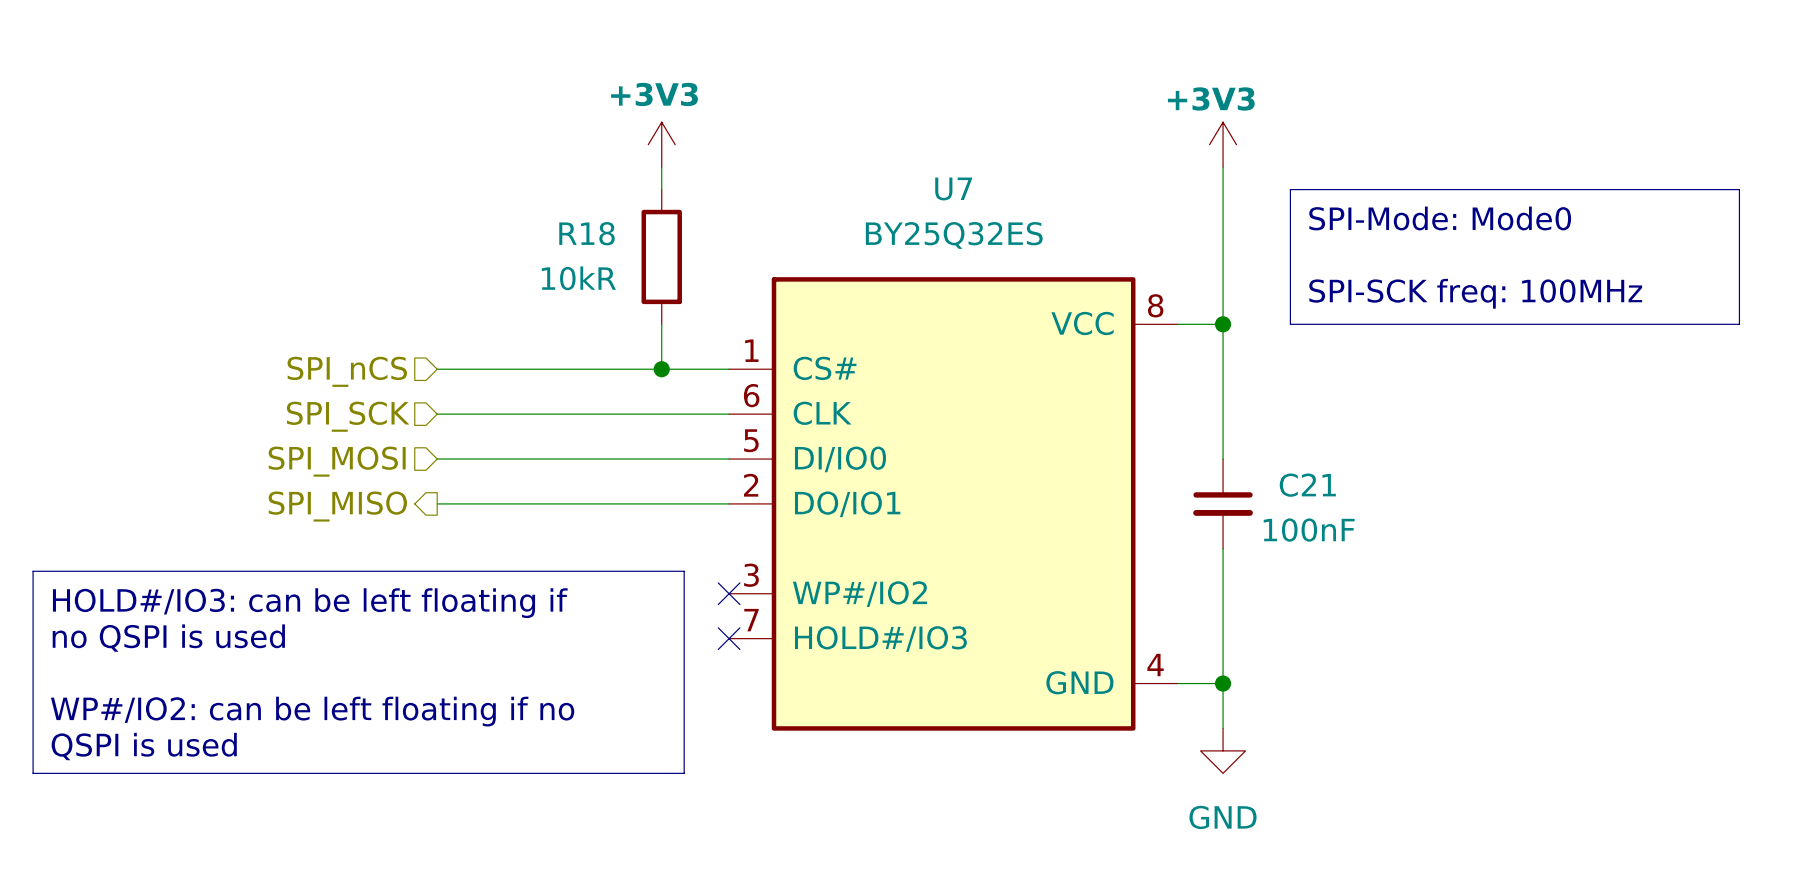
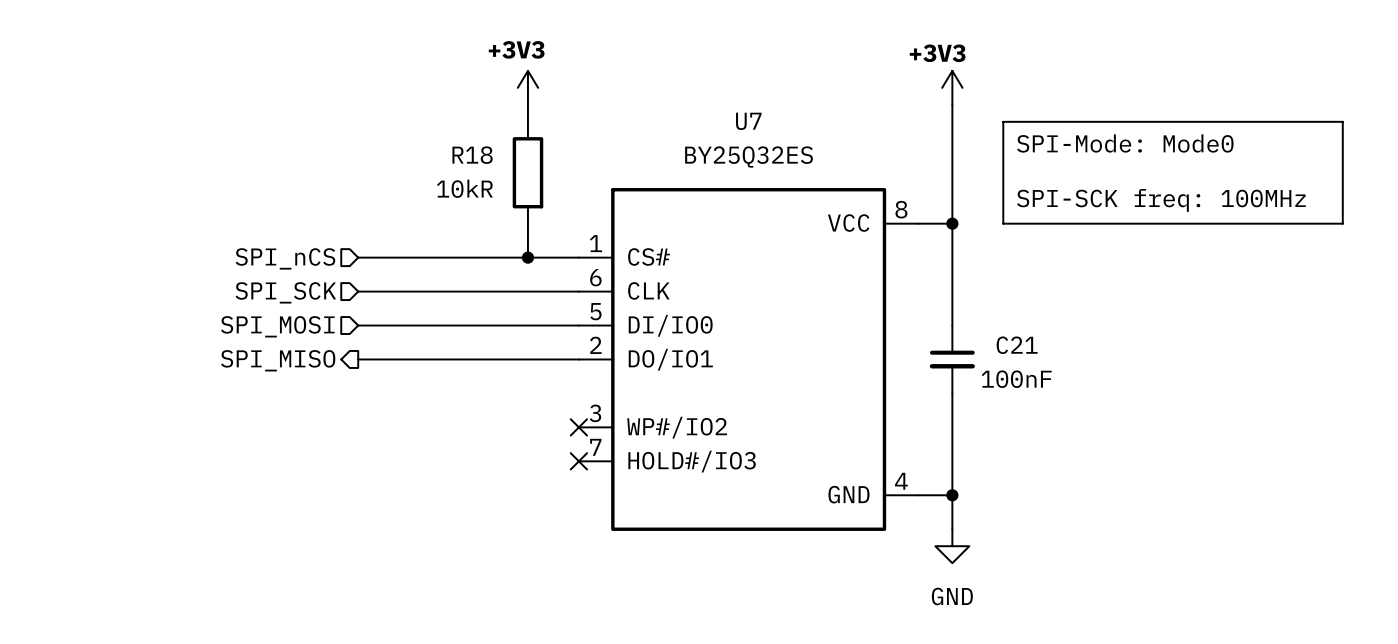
line: (33, 571) (684, 571) (684, 773) (33, 773) (33, 571) -> none
text: HOLD#/IO3: can be left floating if (310, 603) -> none
text: no QSPI is used (168, 638) -> none
text: WP#/IO2: can be left floating if no (312, 711) -> none
text: QSPI is used (144, 746) -> none

